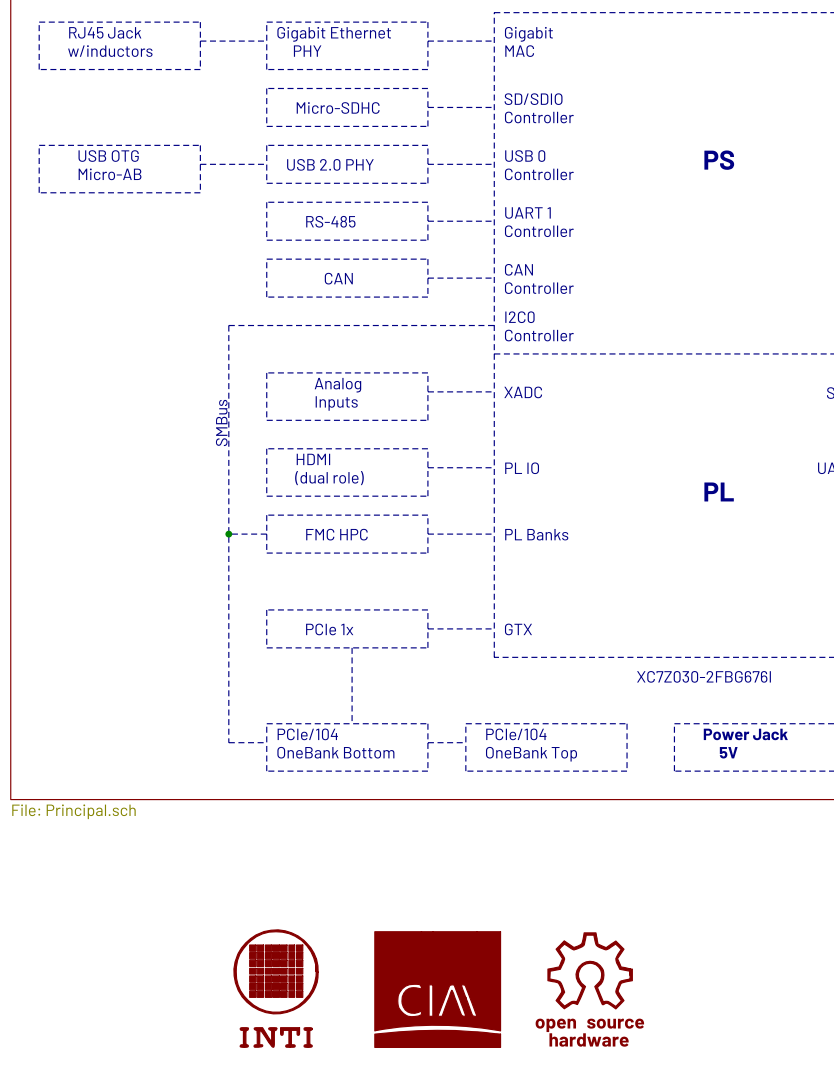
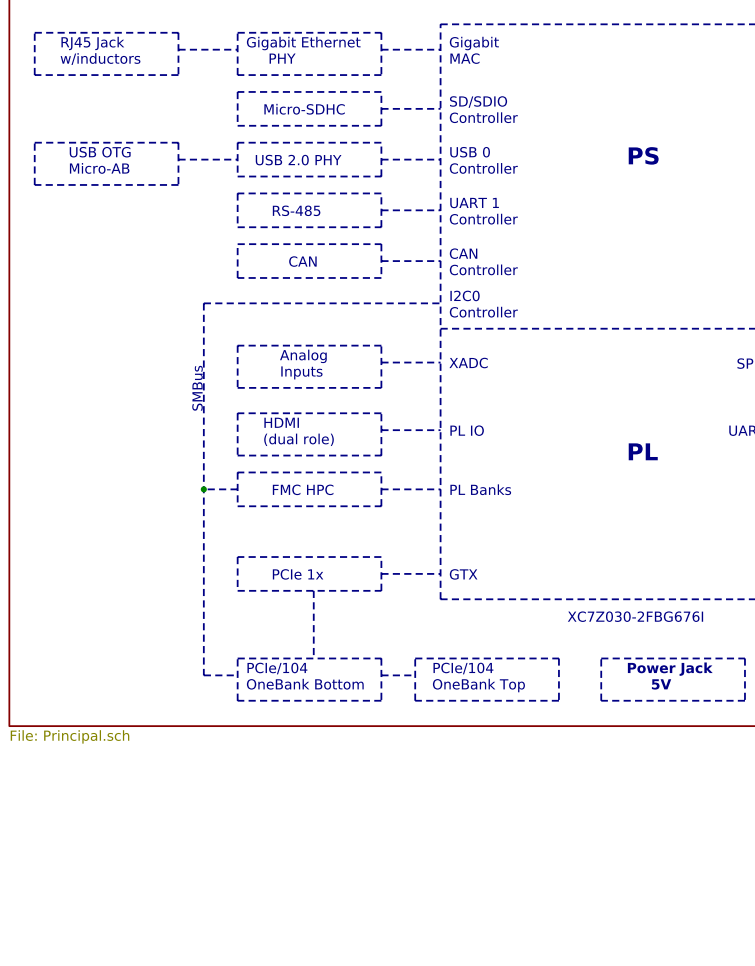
part: (590, 970) -> none
part: (276, 988) -> none
part: (437, 989) -> none

